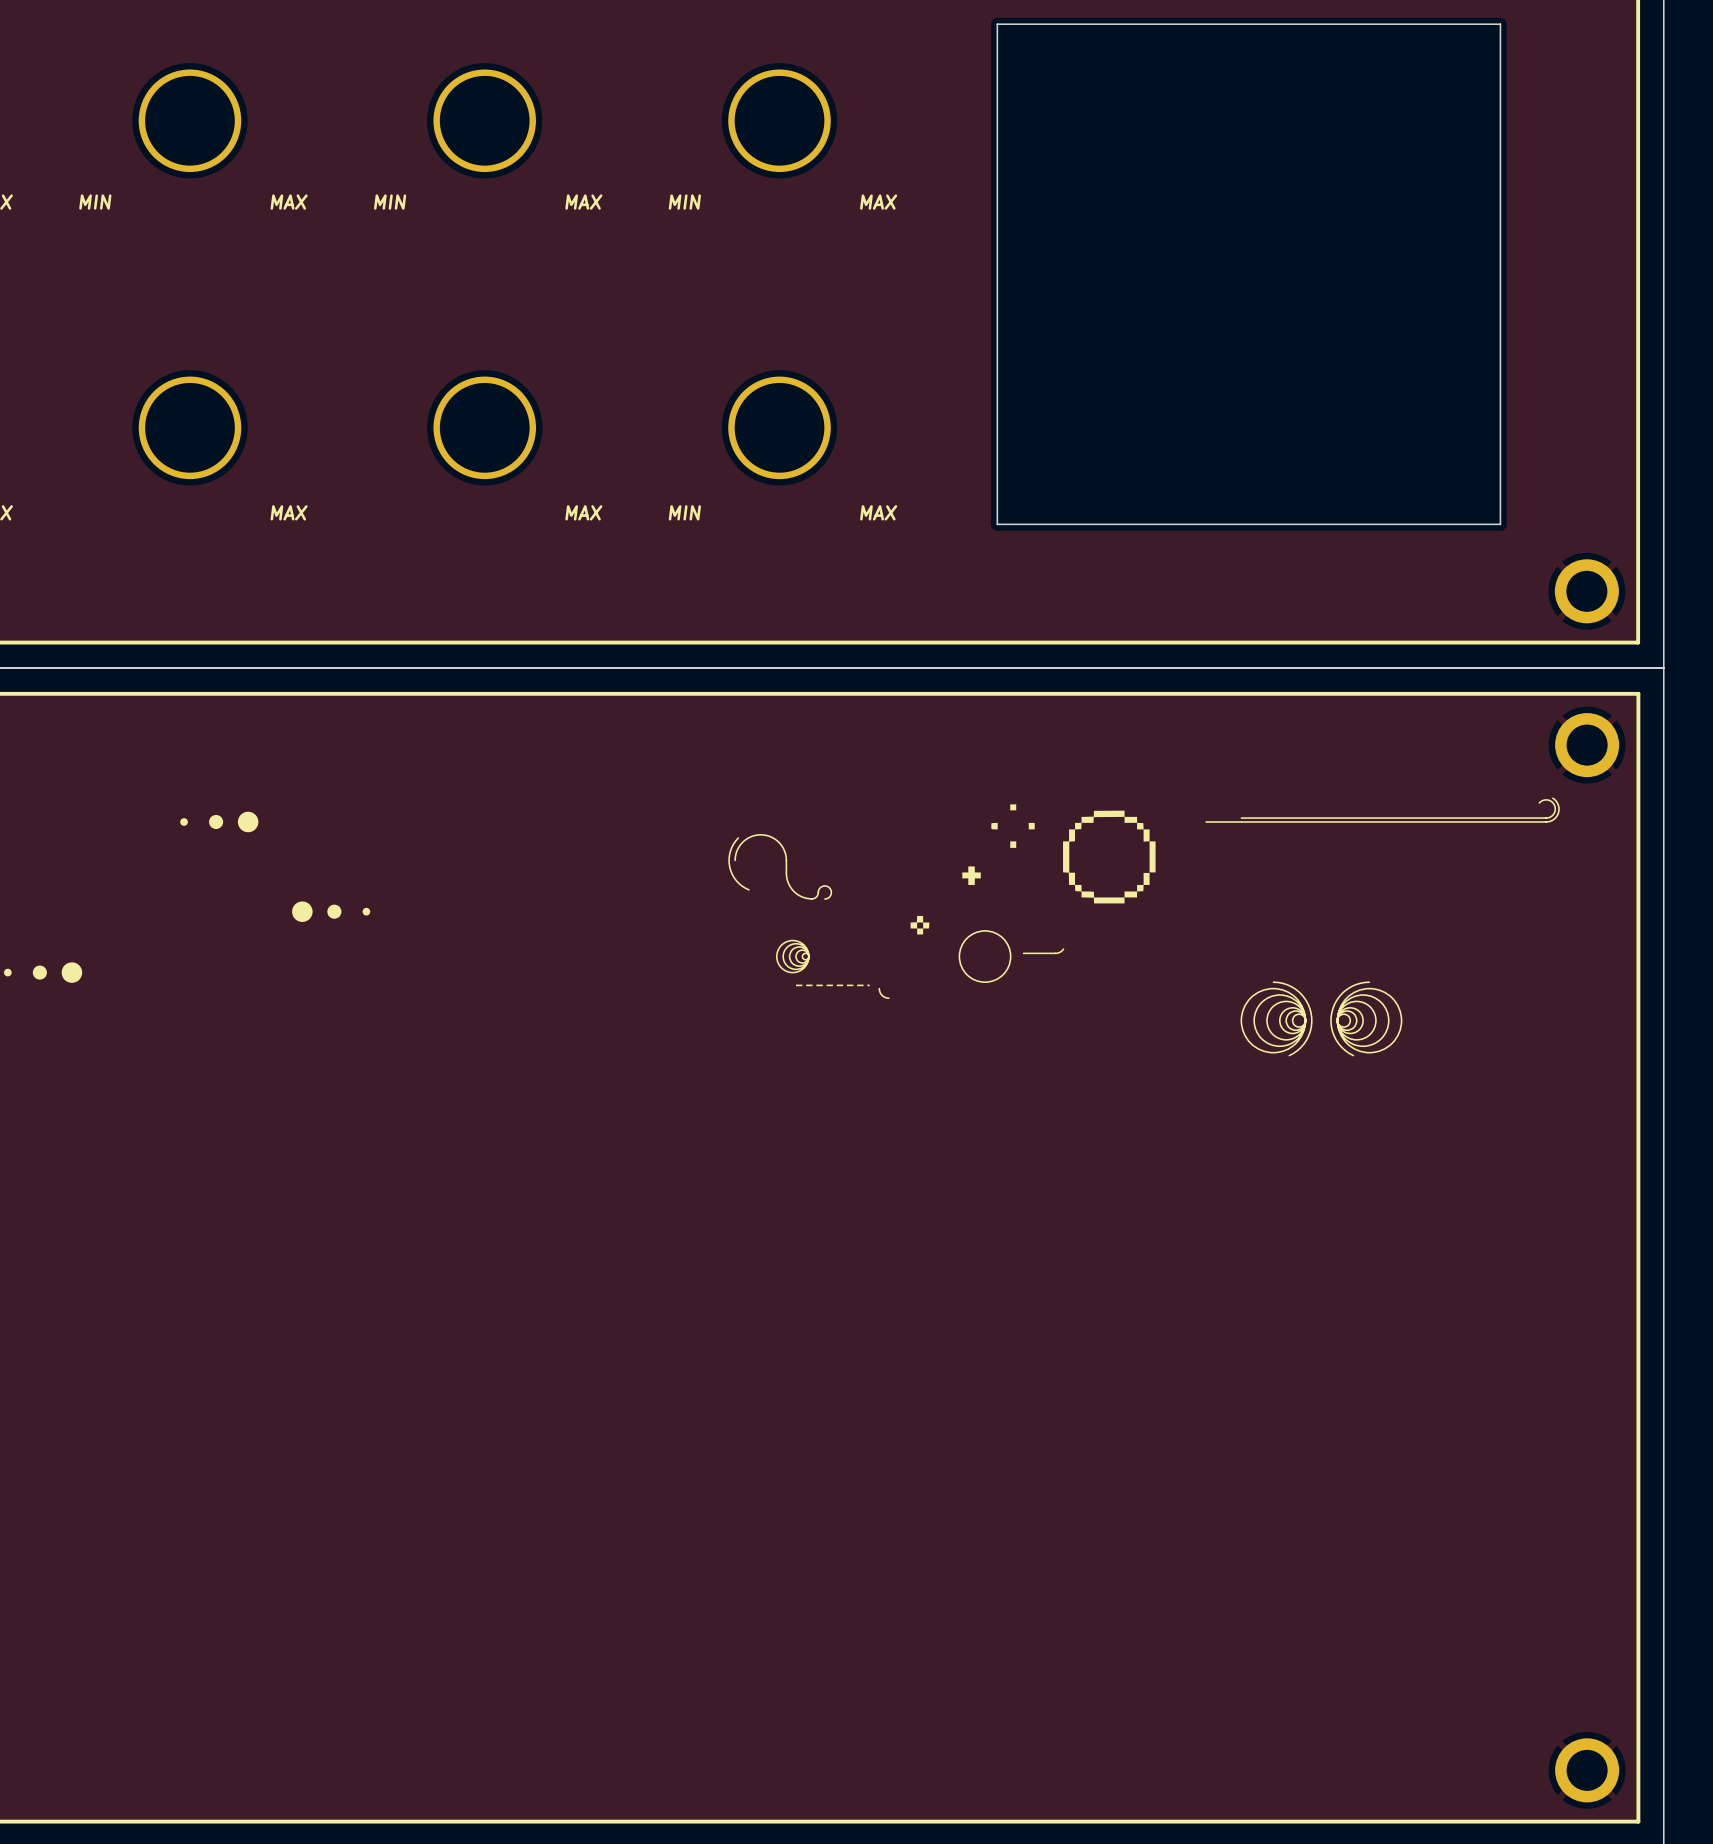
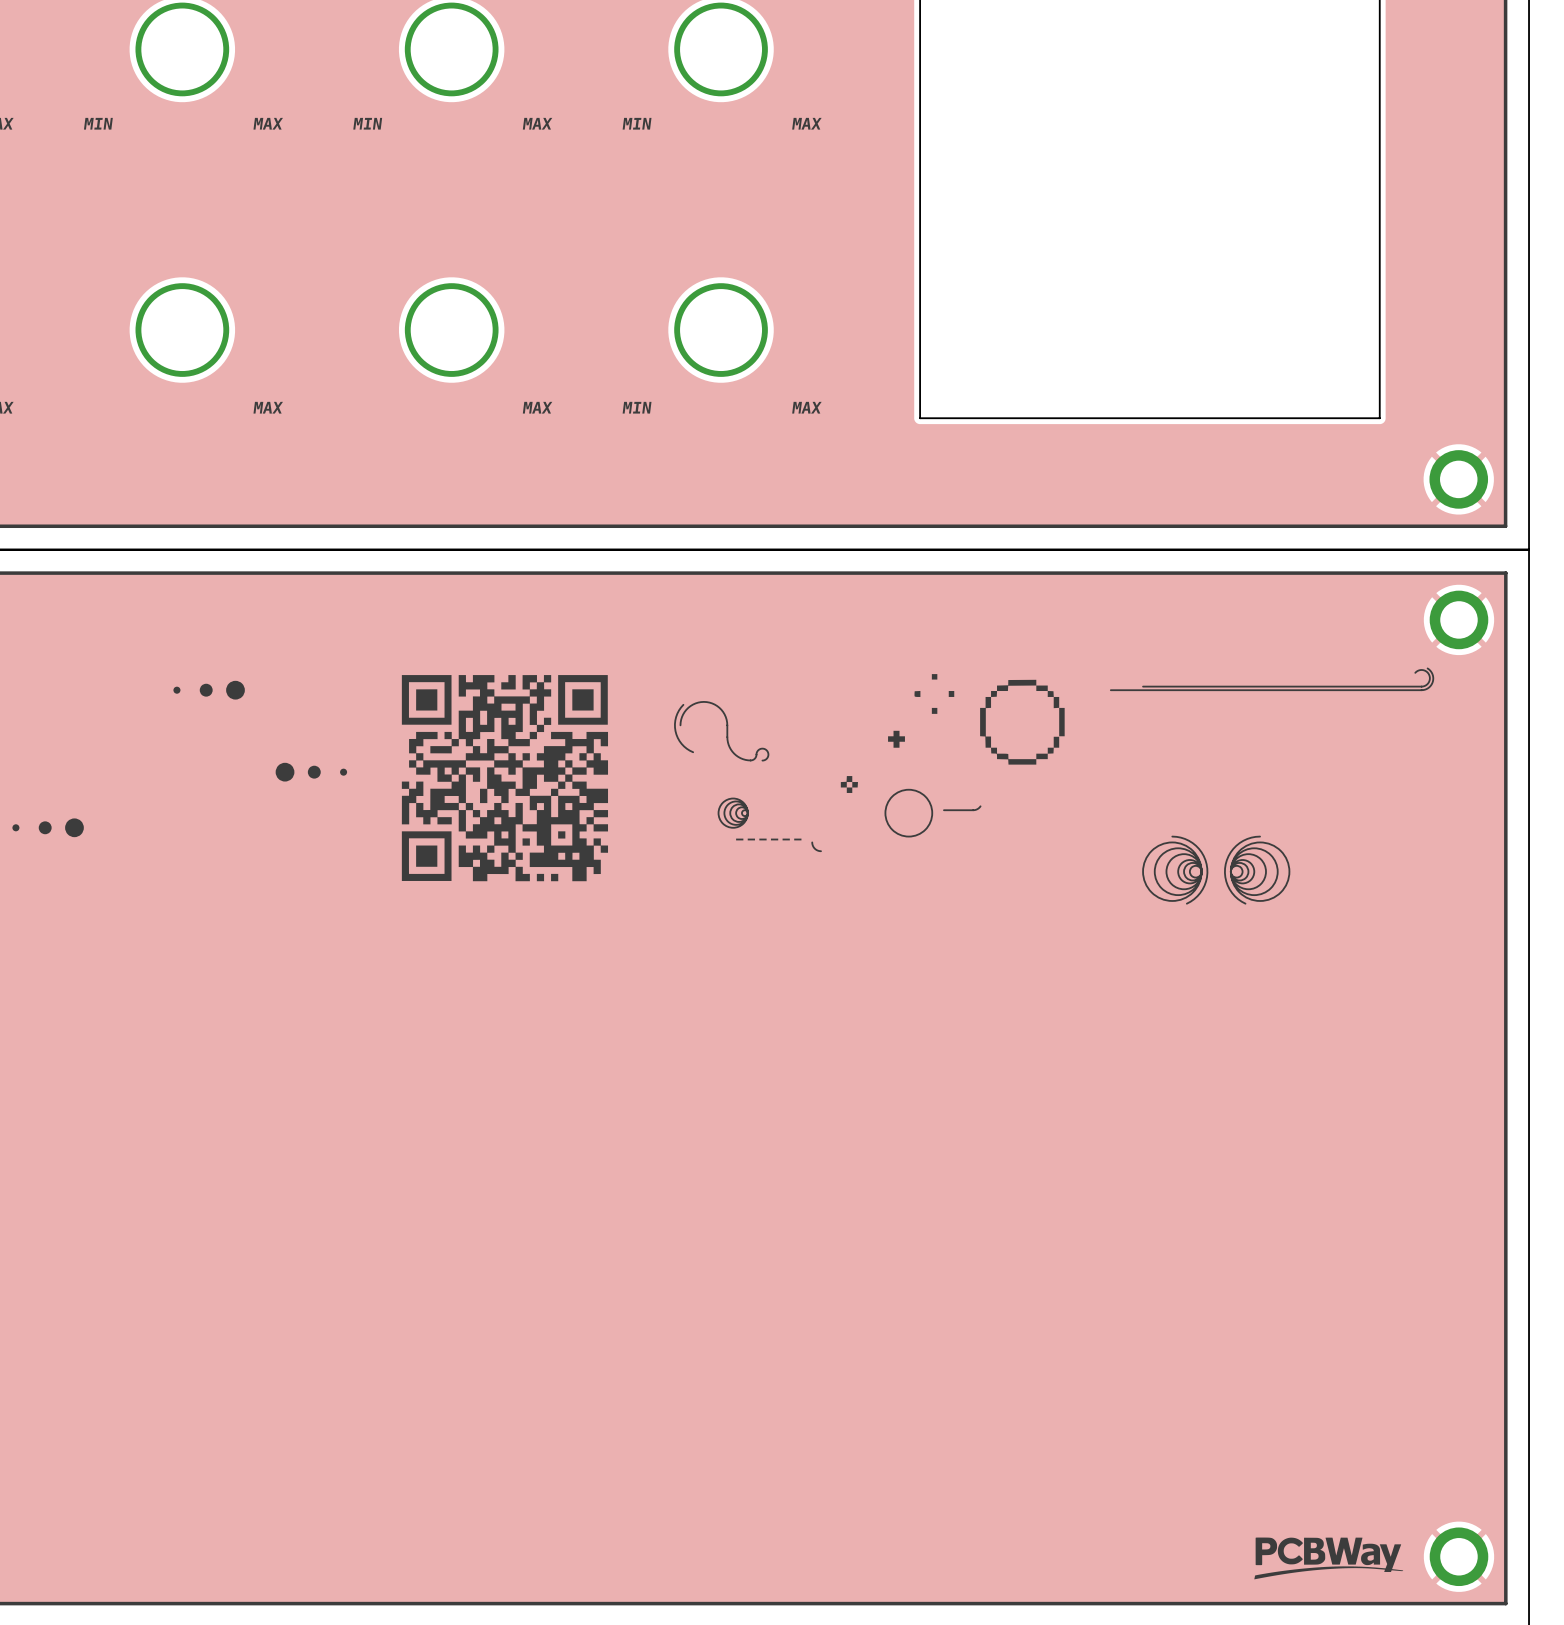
drawing: none -> [401, 675, 609, 882]
drawing: none -> [1254, 1537, 1404, 1580]

